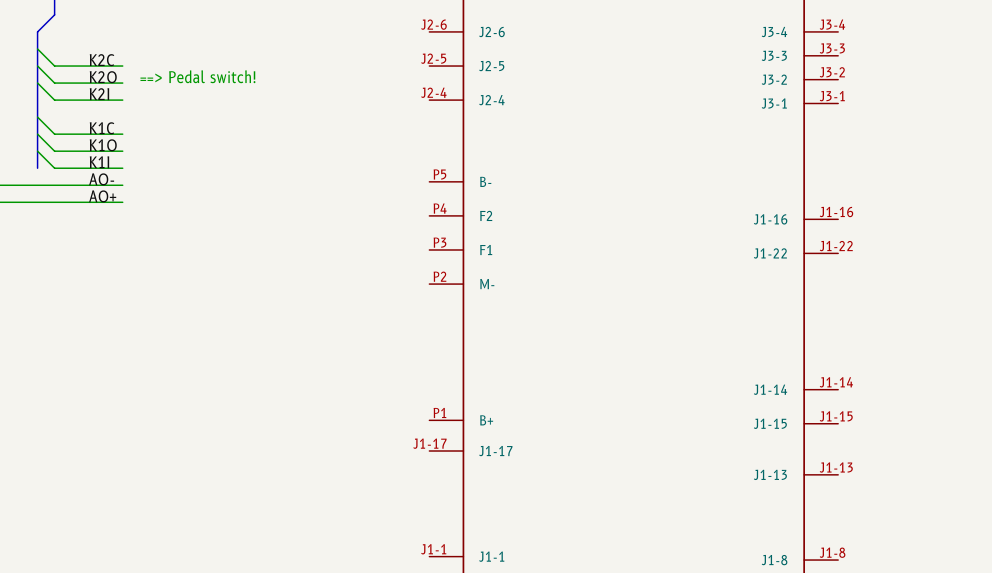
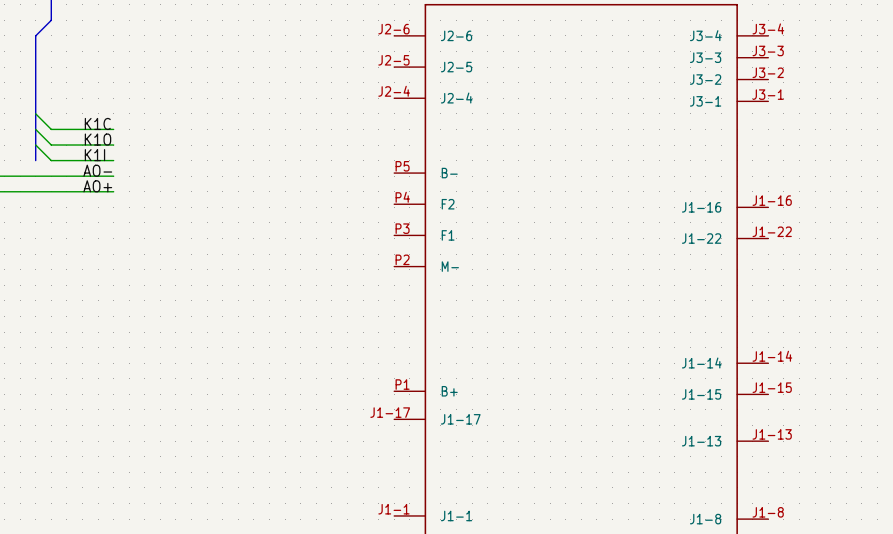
wire: (37, 48) (54, 66) (122, 66) -> none
label: K2C (102, 60) -> none
wire: (37, 66) (54, 83) (122, 83) -> none
text: ==> Pedal switch! (197, 76) -> none
label: K2O (103, 77) -> none
wire: (37, 83) (54, 100) (122, 100) -> none
label: K2I (99, 94) -> none

